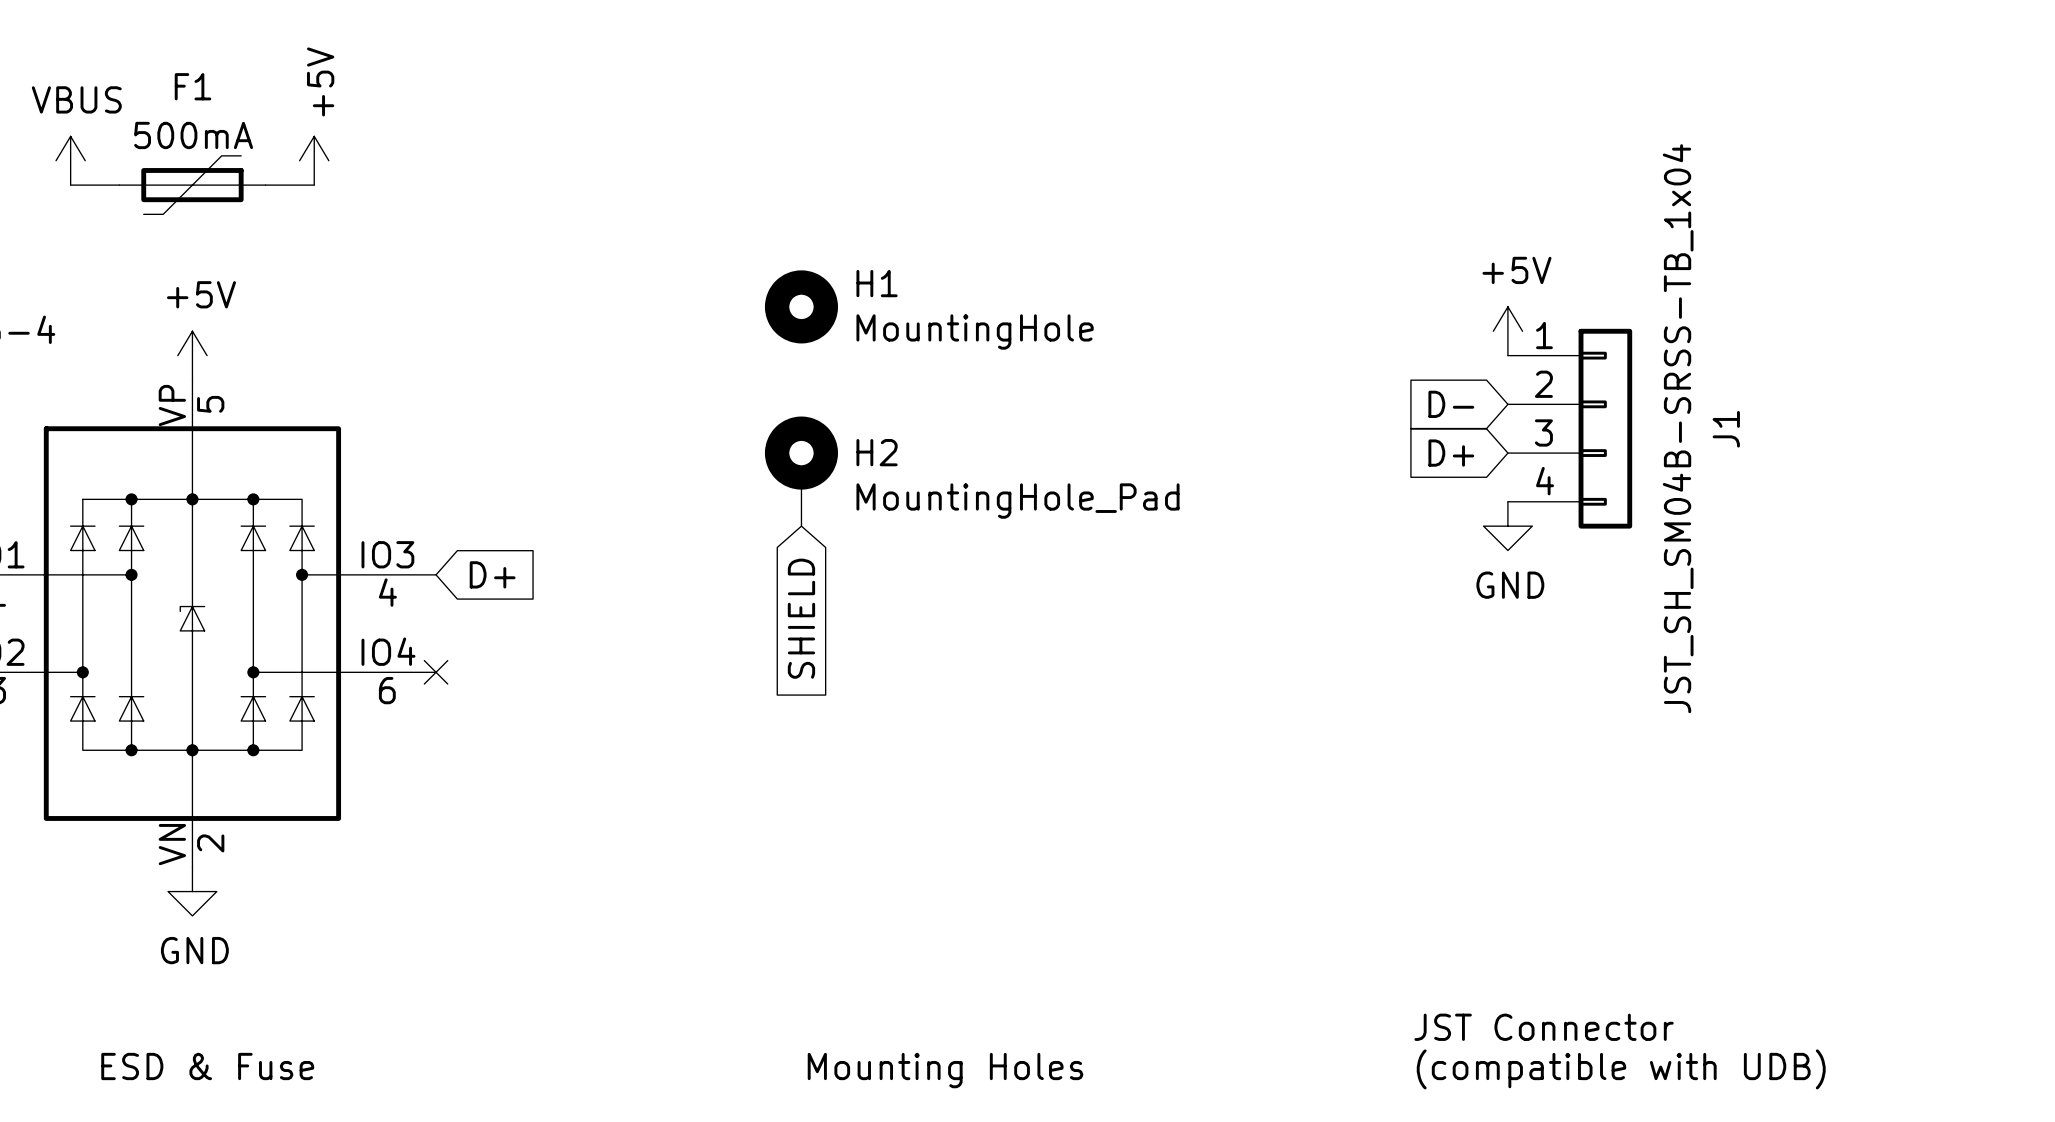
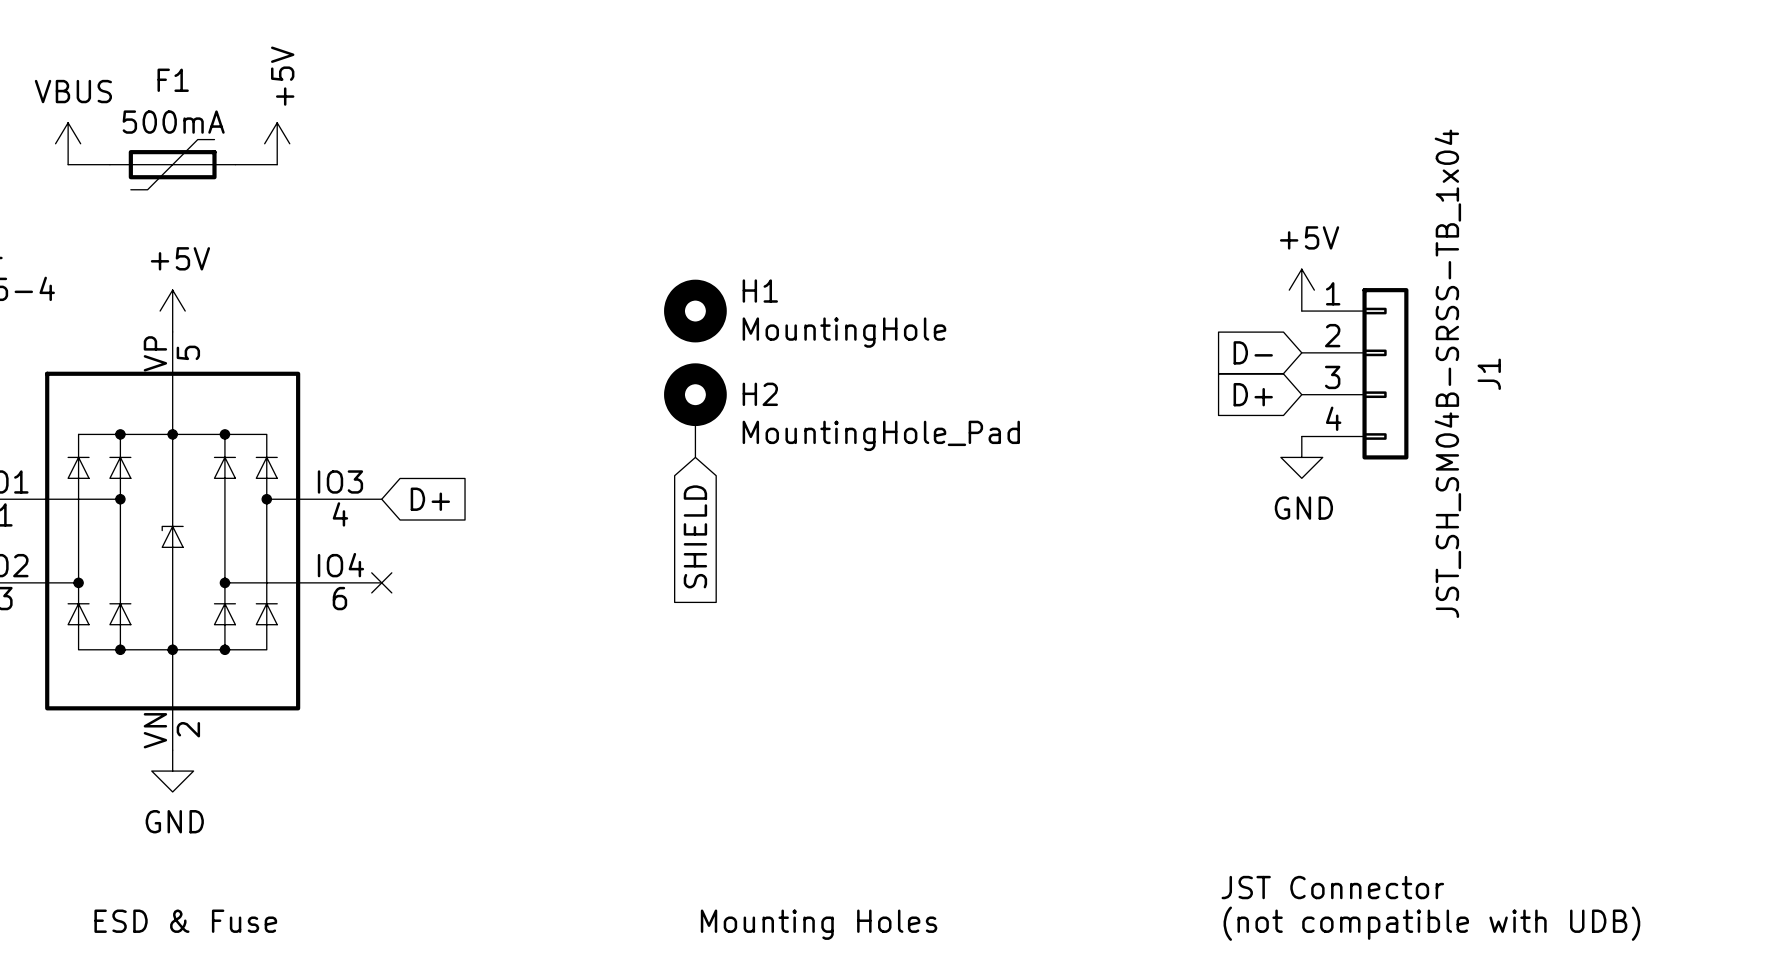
H1 position: (801, 306) -> (695, 311)
text: (compatible with UDB) (1621, 1069) -> (not compatible with UDB) (1431, 923)

